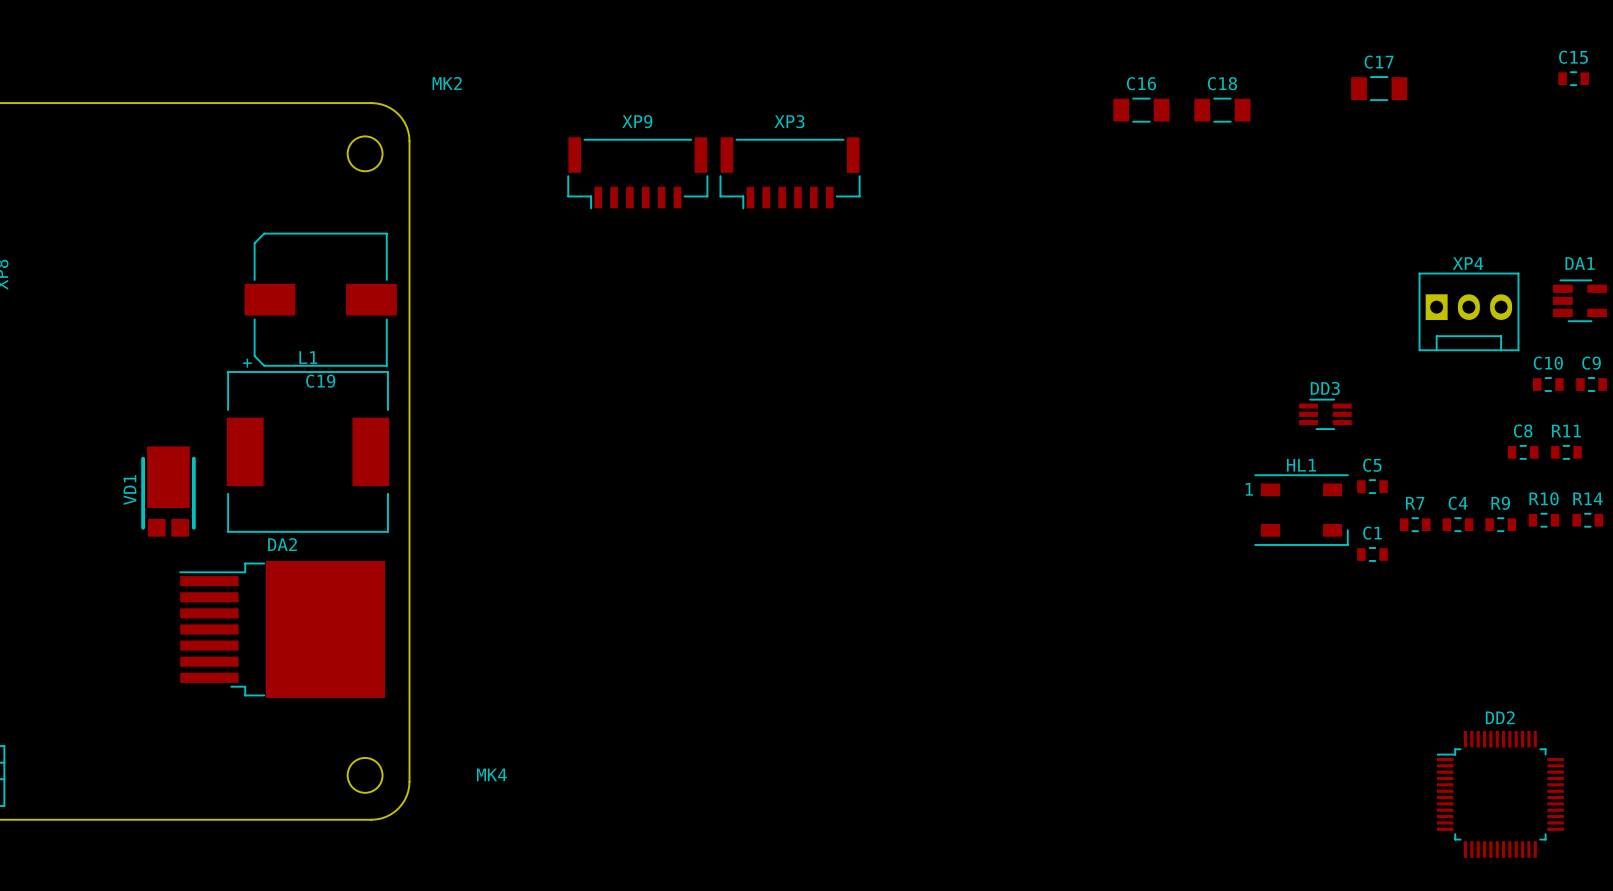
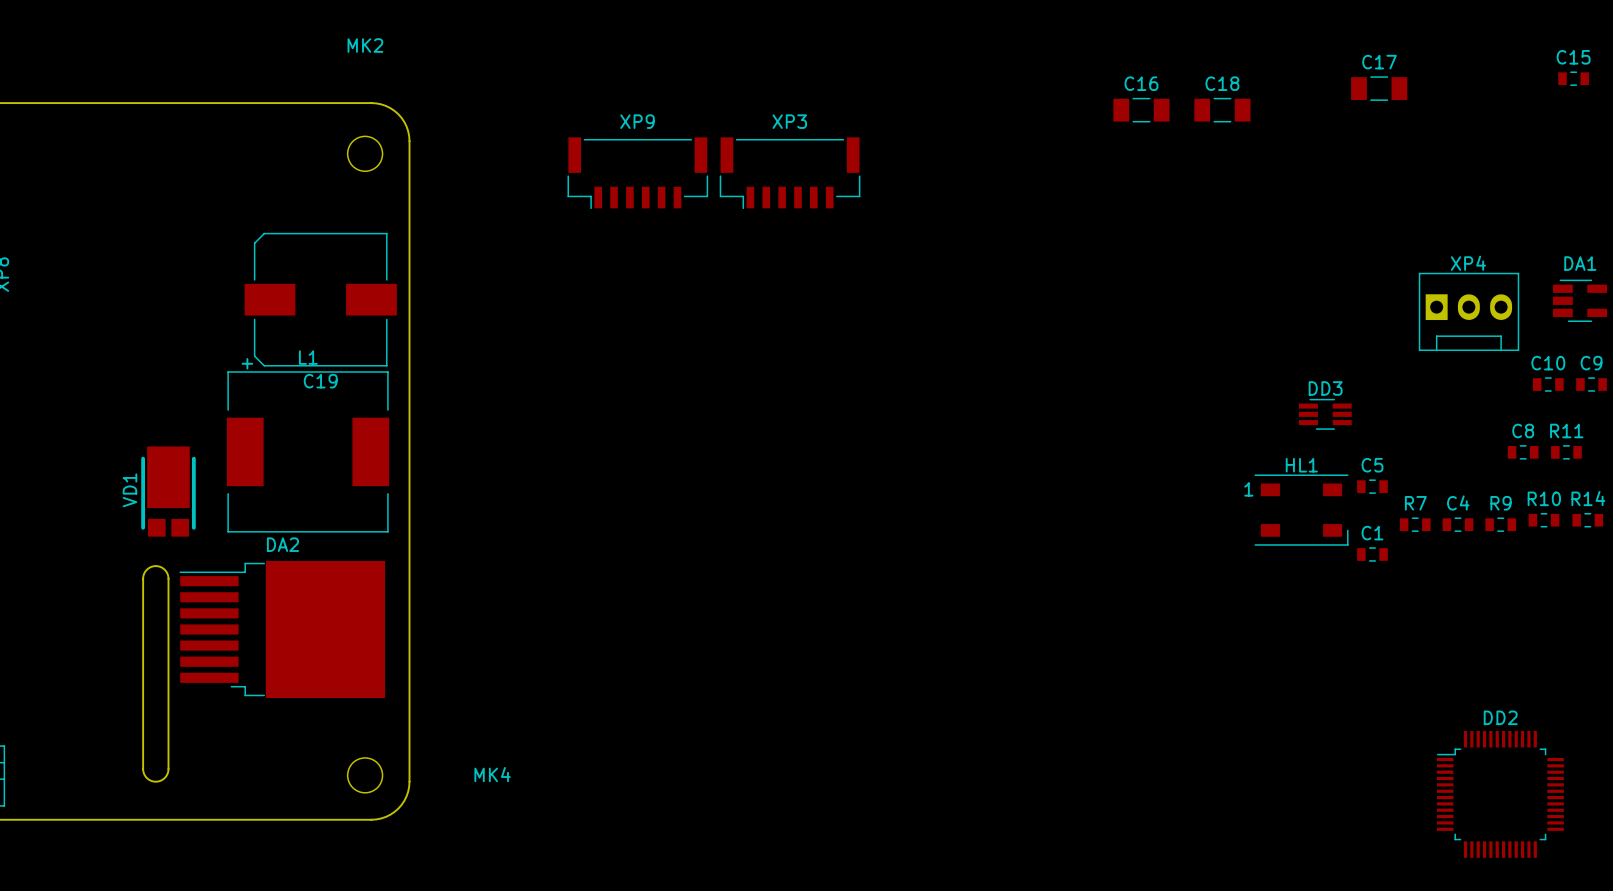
MK2 name position: MK2 (447, 83) -> MK2 (365, 45)
board edge: none -> (143, 578) (143, 770) (148, 779) (157, 781) (165, 776) (168, 769) (168, 577) (164, 569) (155, 566) (146, 569) (143, 578)

